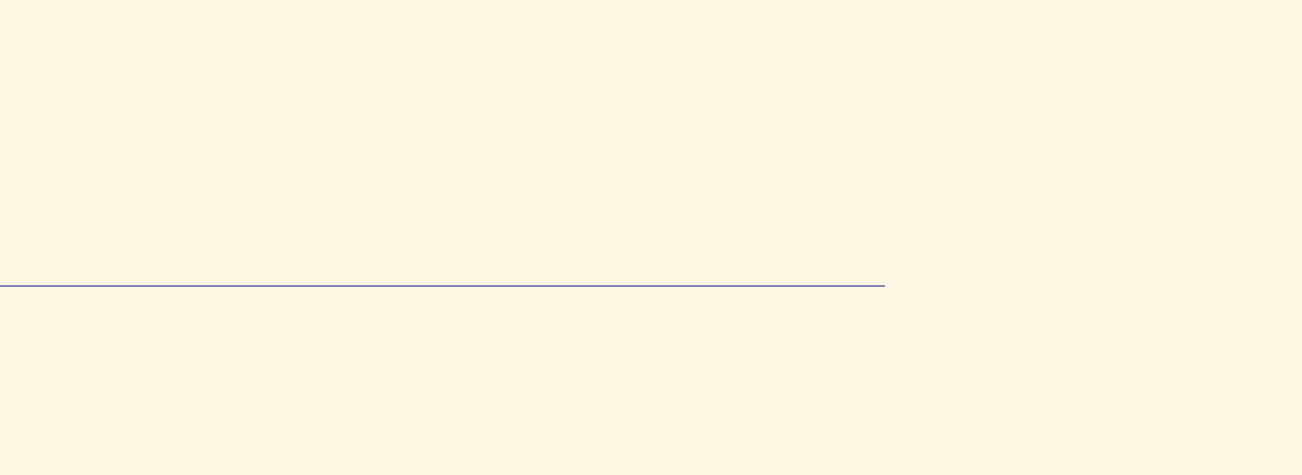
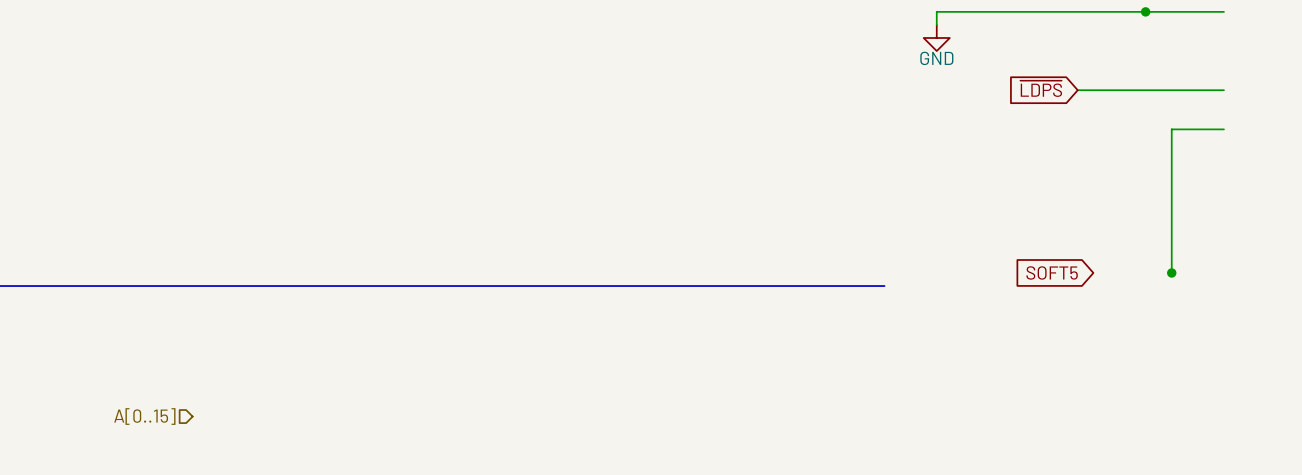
junction: none -> (1145, 11)
wire: none -> (1223, 11) (936, 11) (936, 24)
power symbol: none -> GND (936, 37)
global label: none -> ~{LDPS} (1041, 88)
wire: none -> (1077, 90) (1223, 90)
wire: none -> (1223, 129) (1171, 129) (1171, 272)
global label: none -> SOFT5 (1052, 272)
junction: none -> (1171, 272)
hierarchical label: none -> A[0..15] (144, 416)

